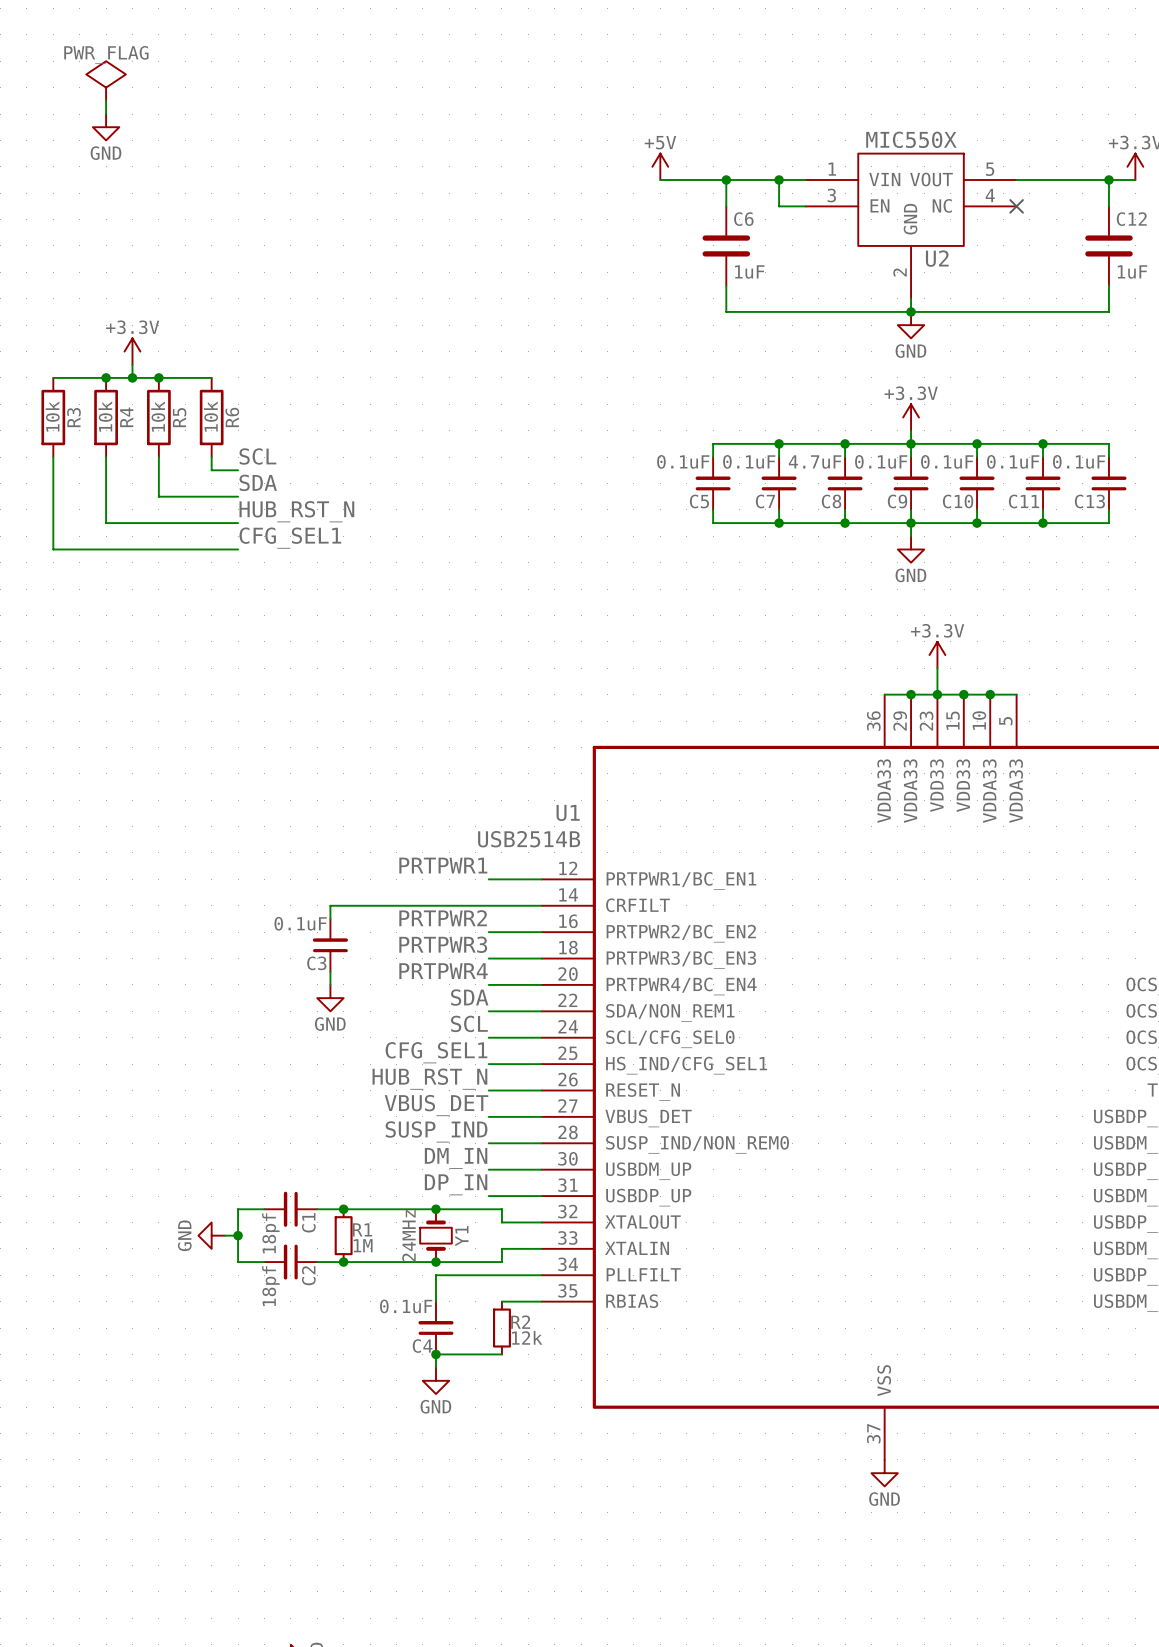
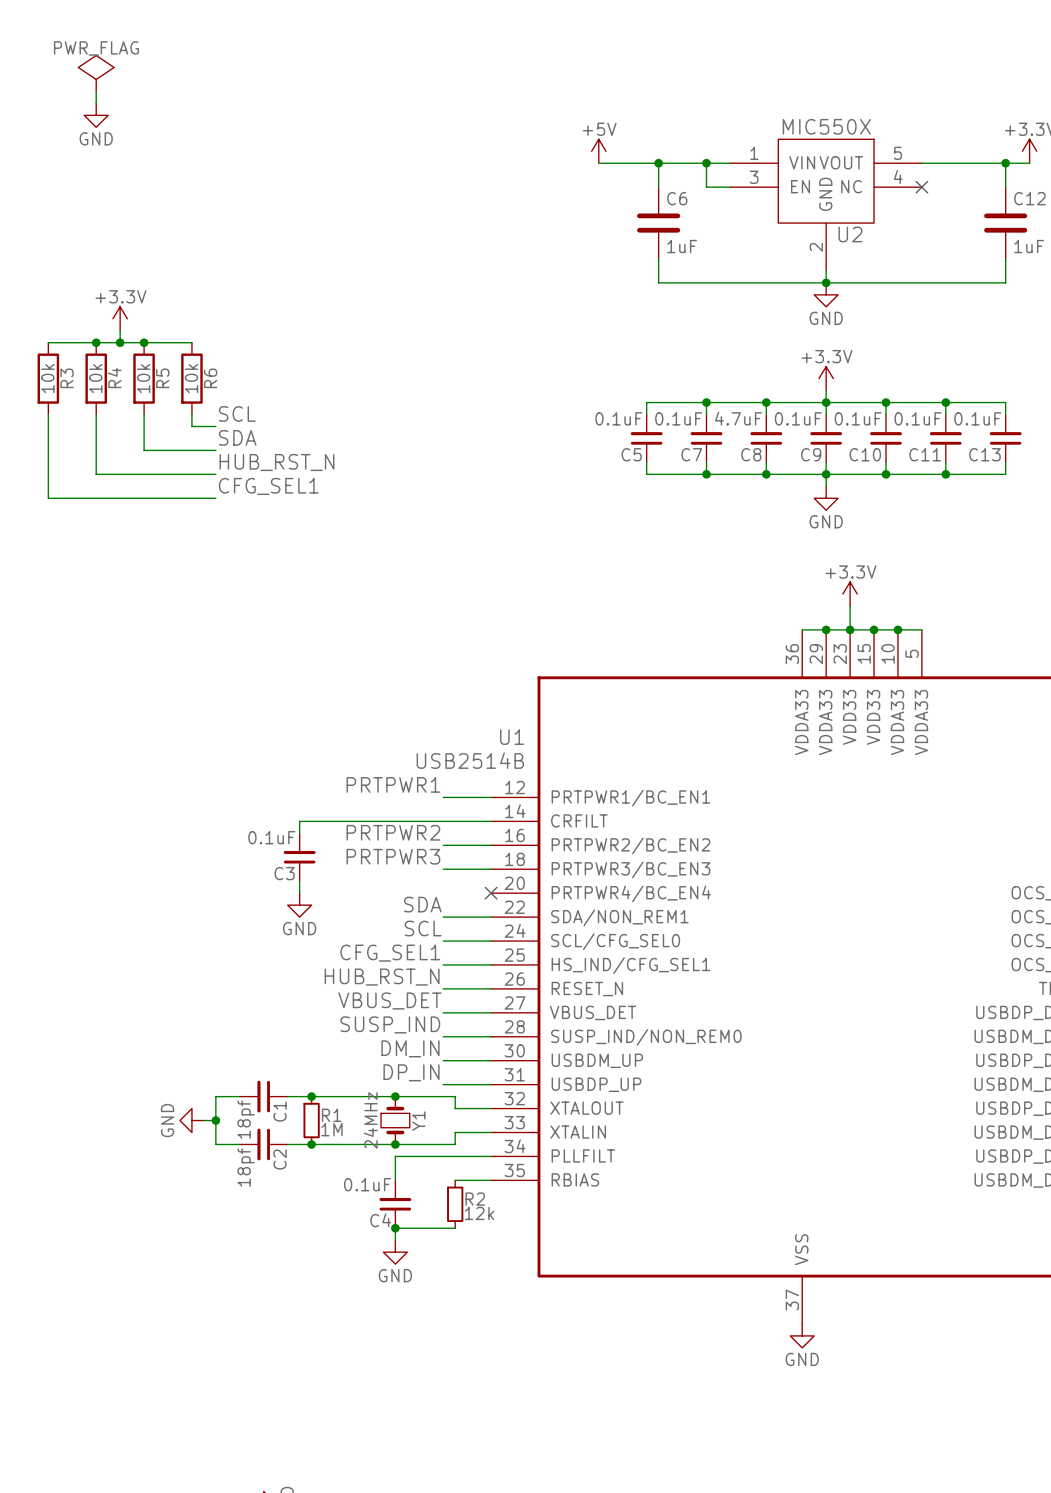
label: PRTPWR4 (443, 971) -> none
wire: (488, 984) (541, 984) -> none
no-connect mark: none -> (491, 893)

